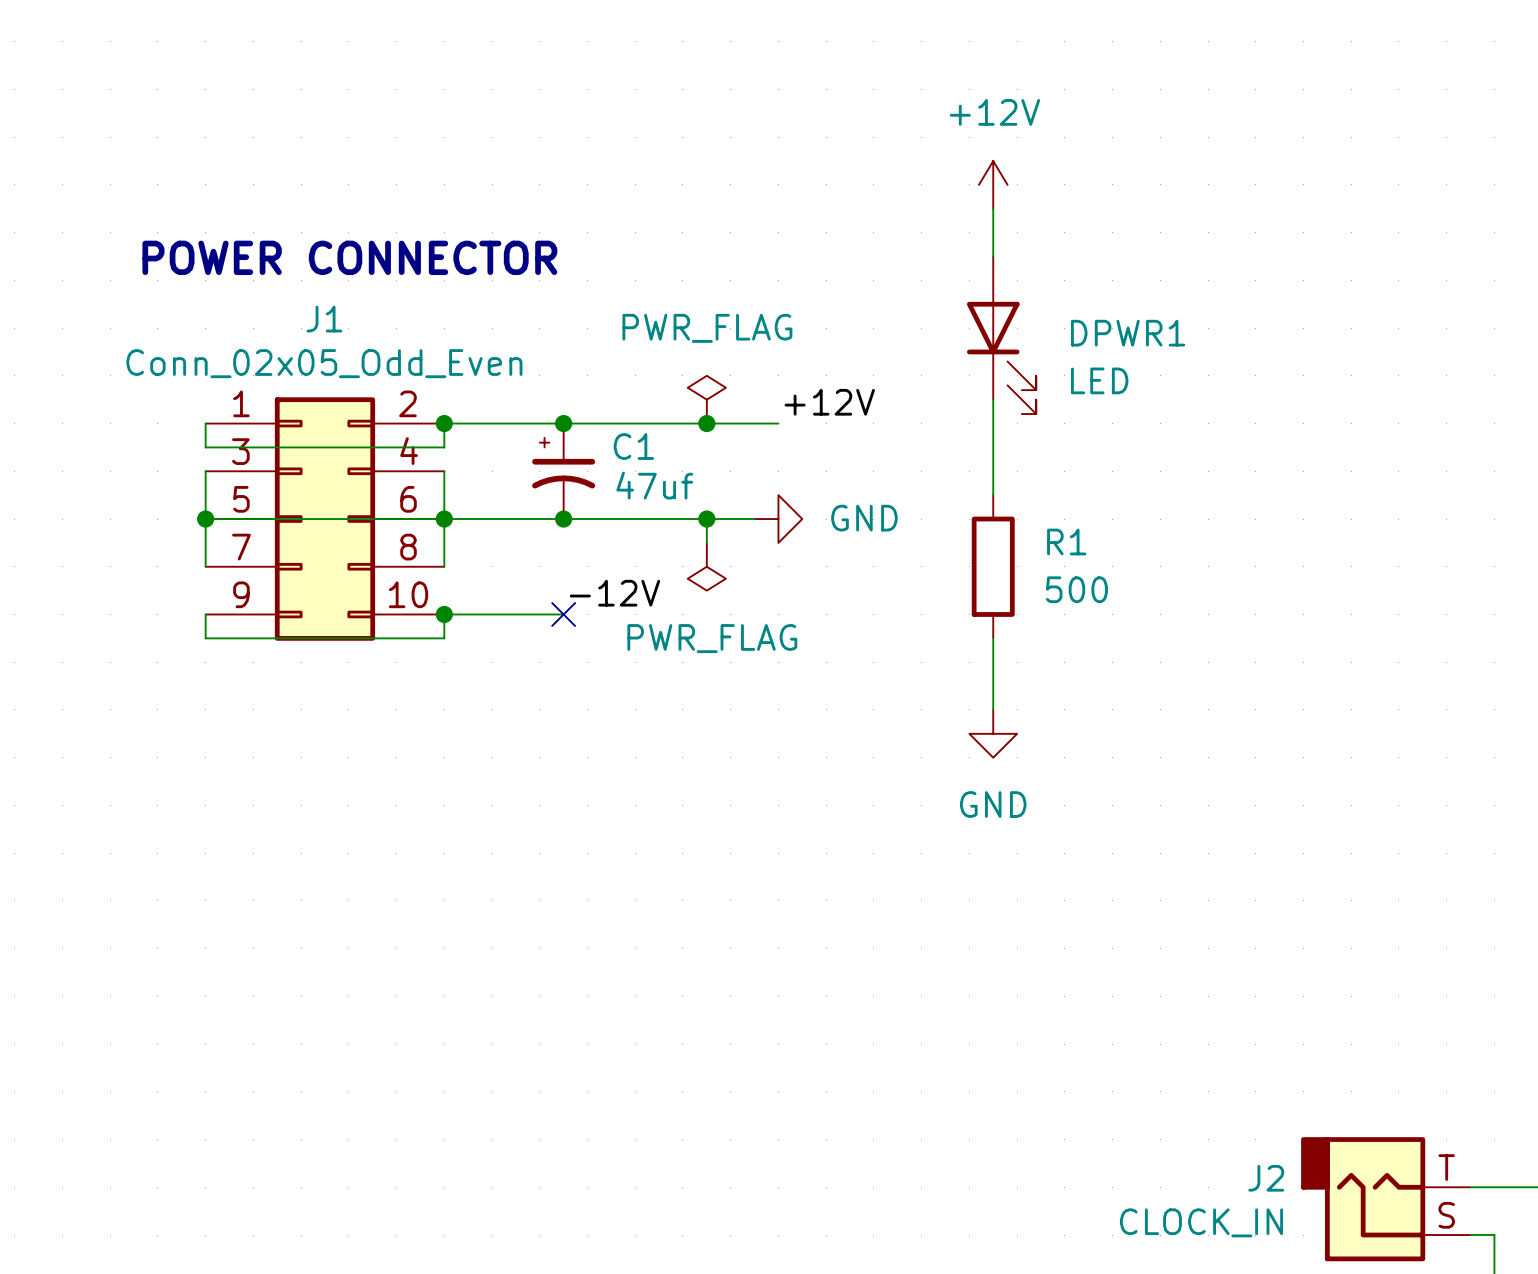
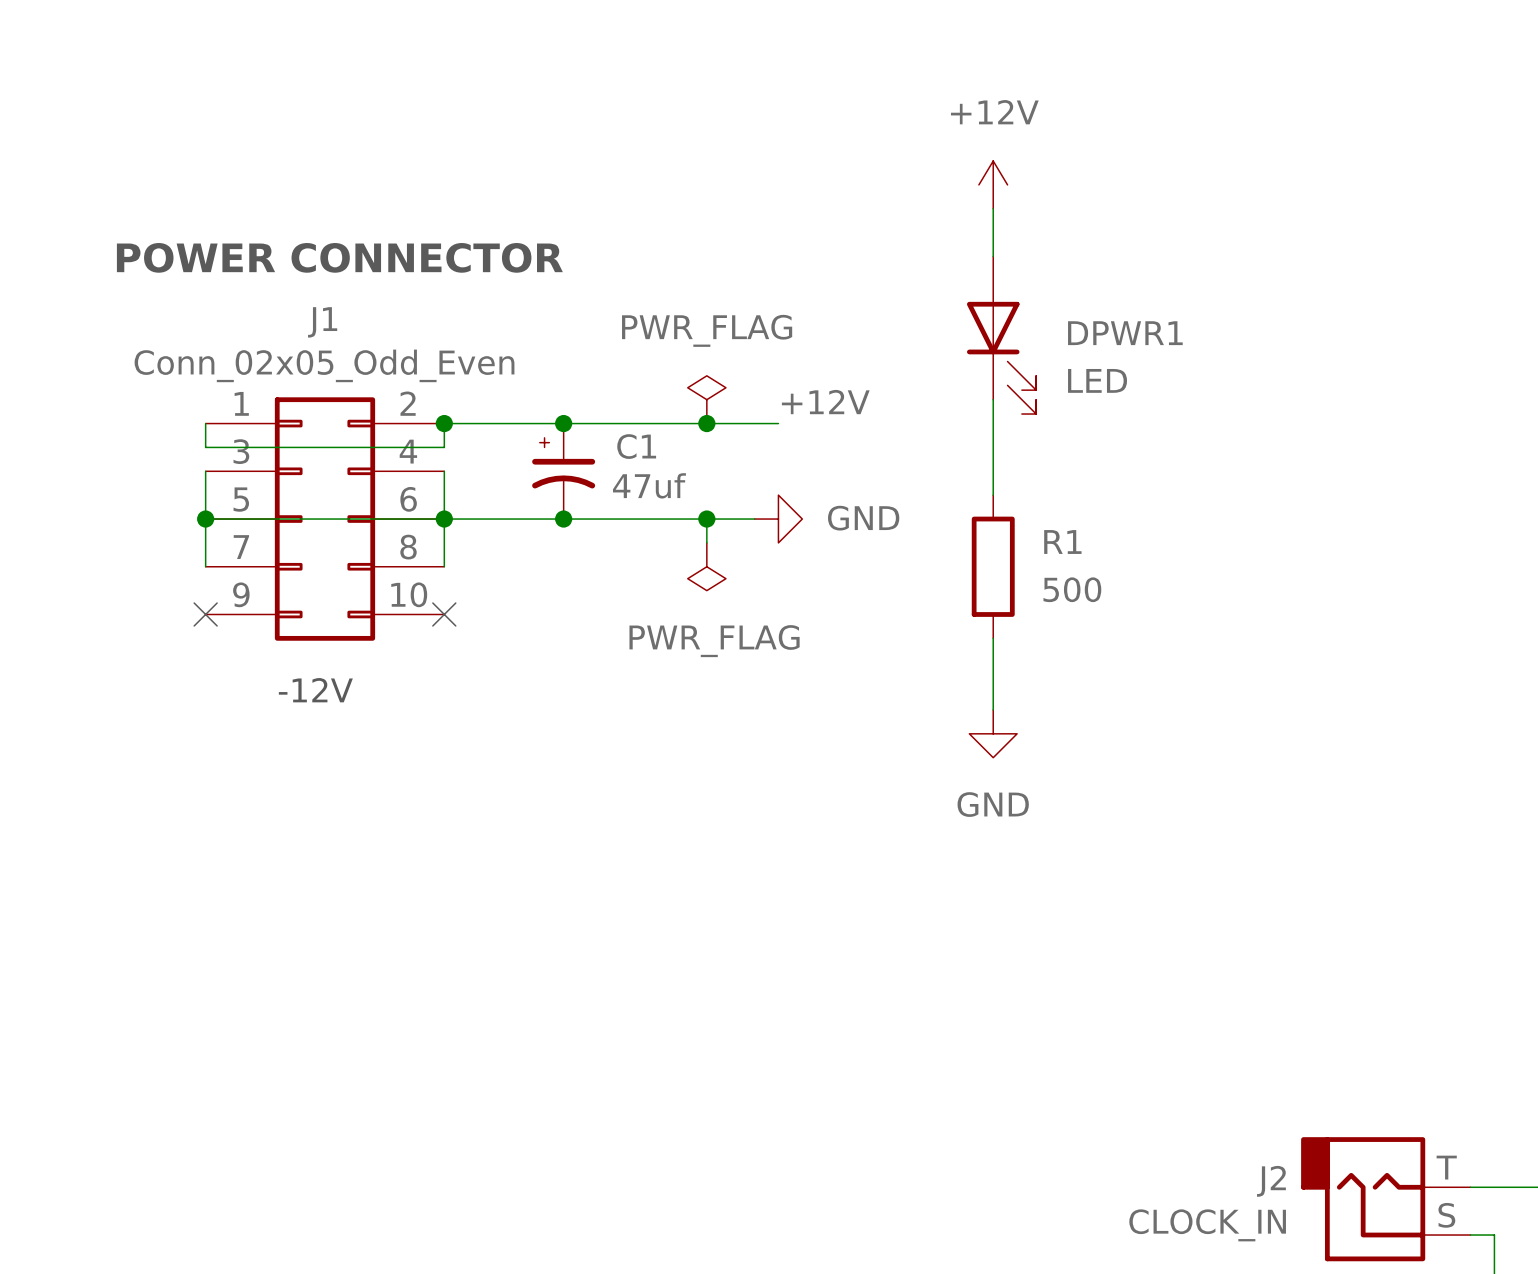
label: -12V (614, 593) -> none
wire: (205, 614) (205, 638) (444, 638) (444, 614) (563, 614) -> none
no-connect mark: none -> (205, 614)
junction: (444, 614) -> none
no-connect mark: none -> (444, 614)
no-connect mark: (563, 614) -> none
text: none -> -12V (315, 690)

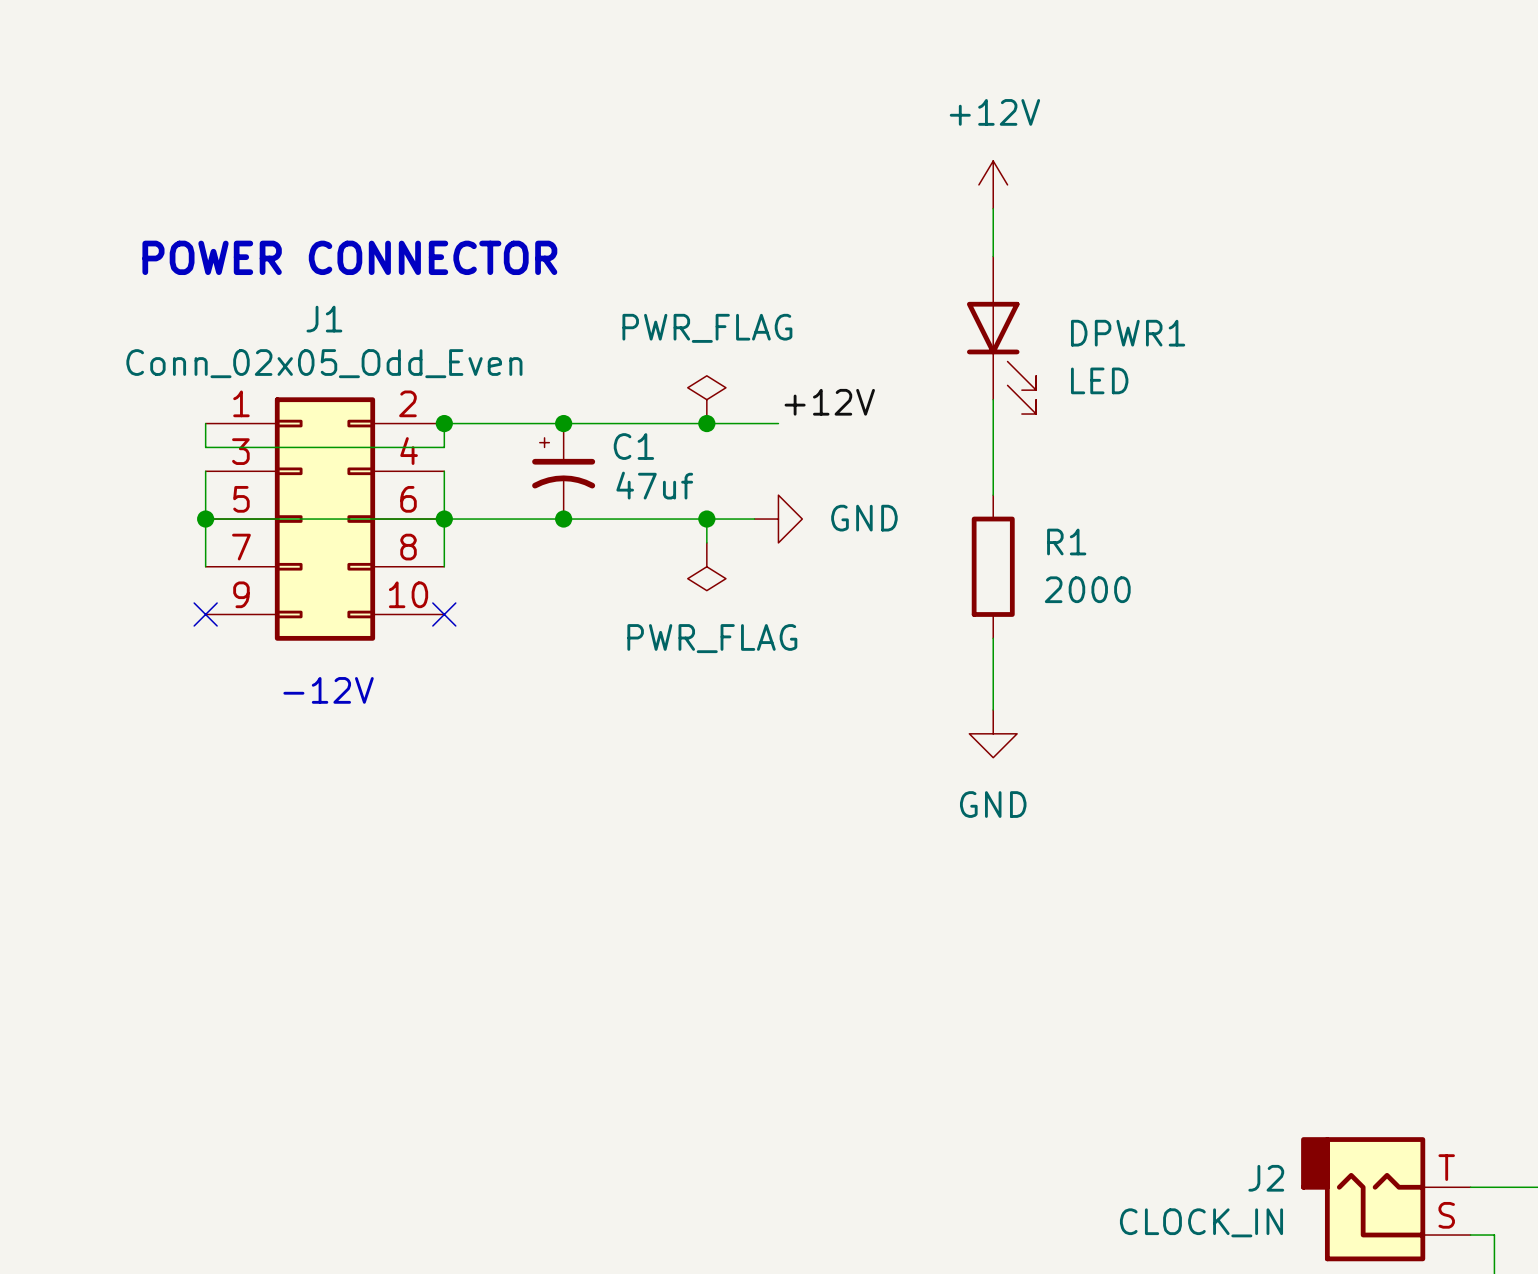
R1 value: 500 (1072, 589) -> 2000 (1087, 589)

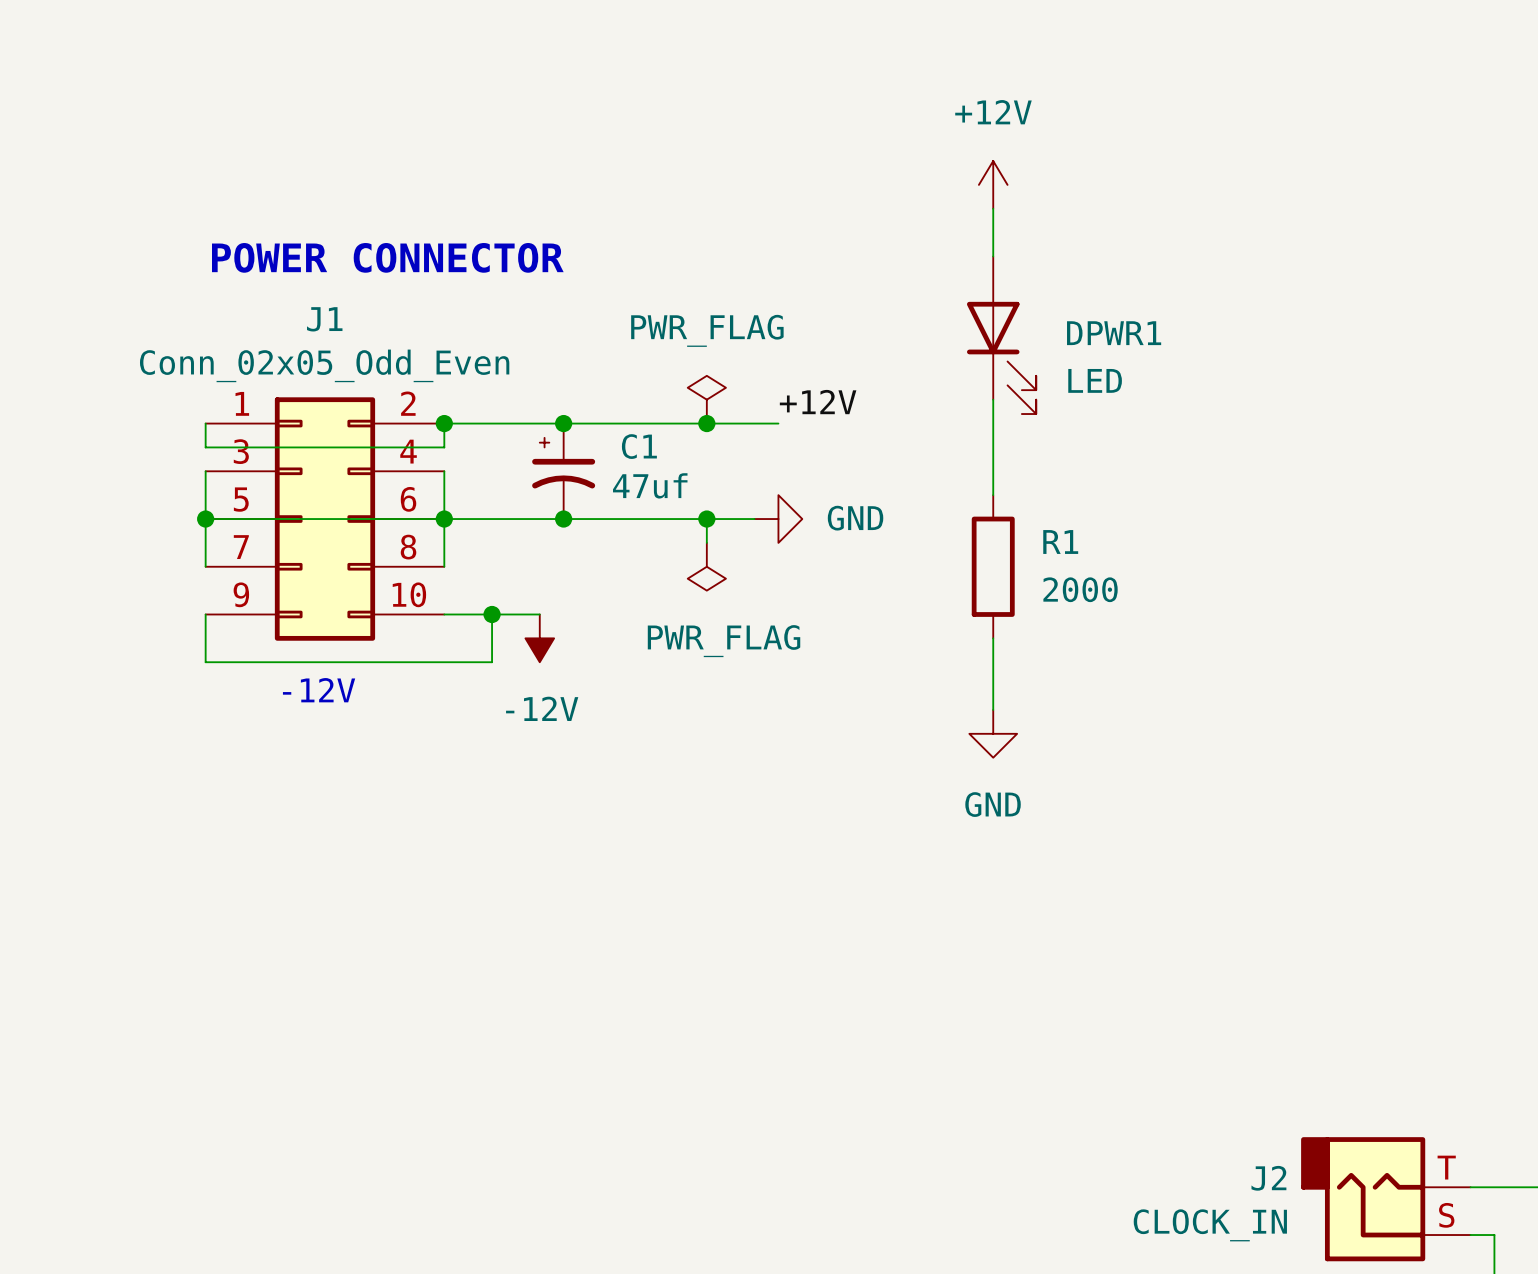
wire: none -> (205, 614) (205, 662) (492, 662) (492, 614)
no-connect mark: (205, 614) -> none
wire: none -> (444, 614) (539, 614)
no-connect mark: (444, 614) -> none
junction: none -> (492, 614)
power symbol: none -> -12V (539, 638)

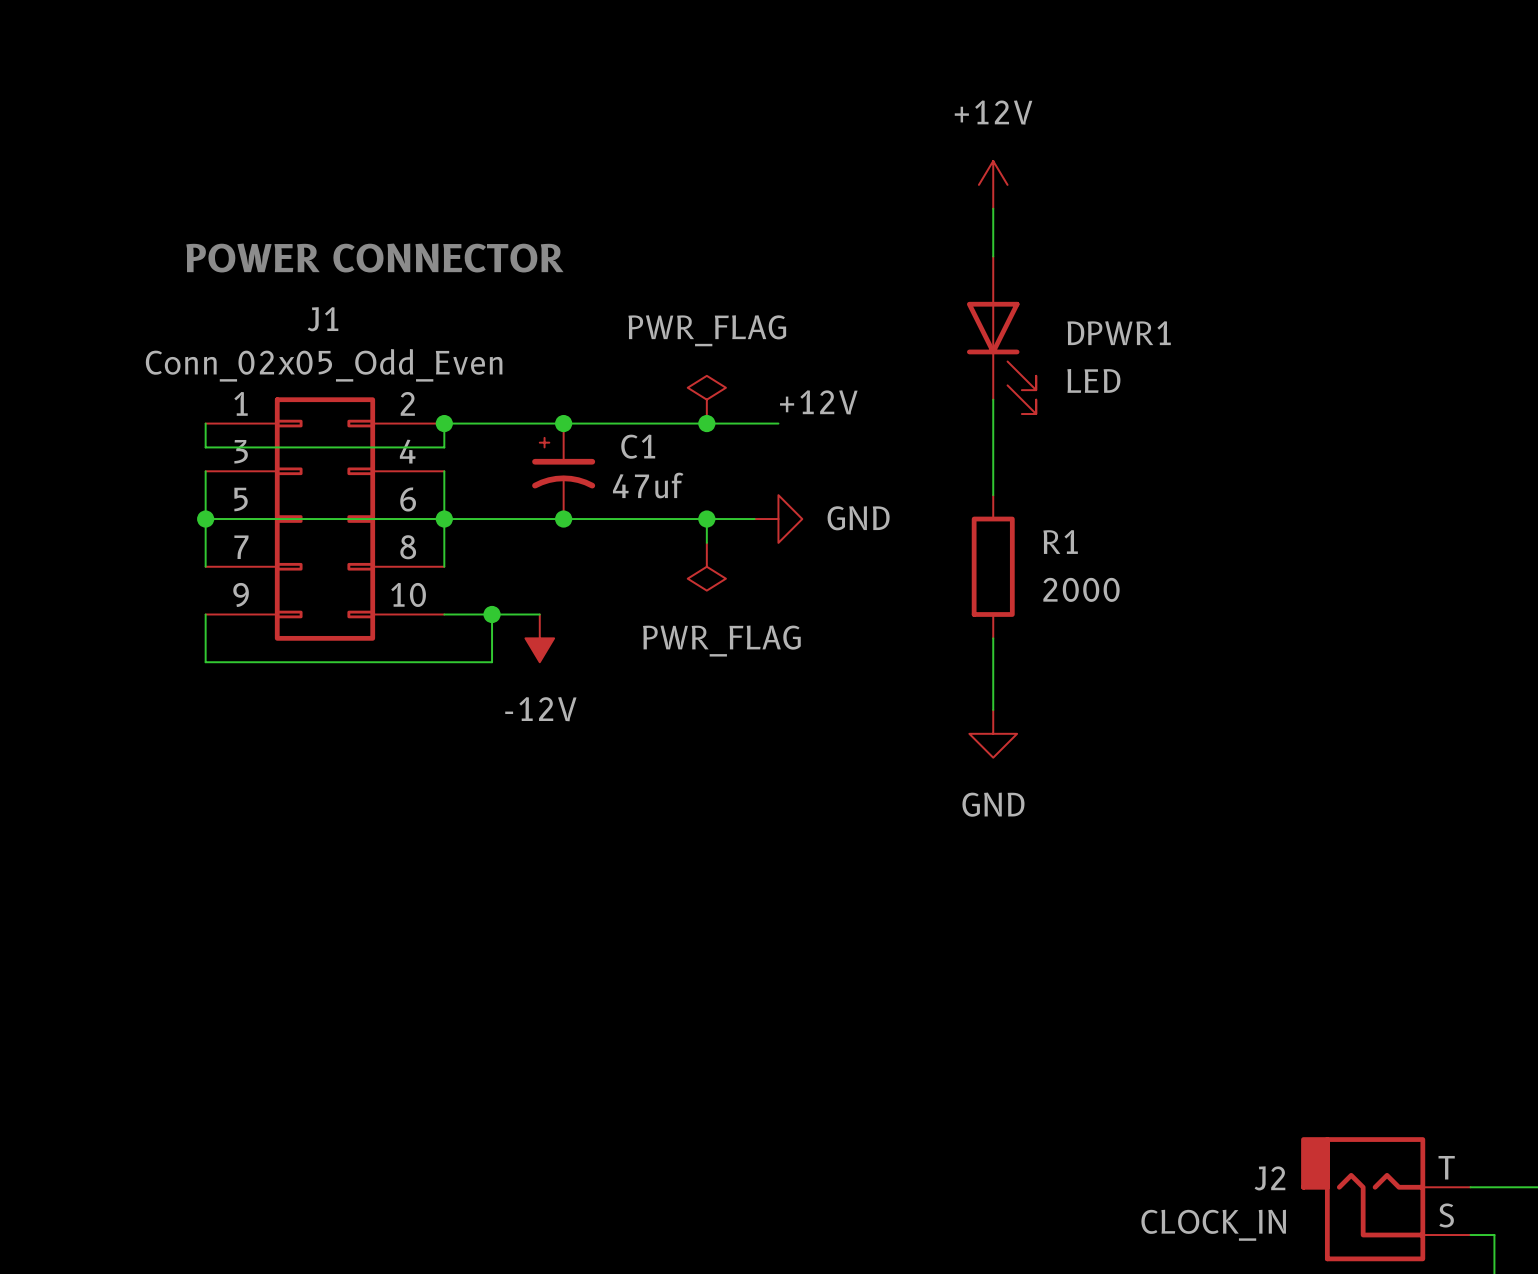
text: -12V (319, 690) -> none

